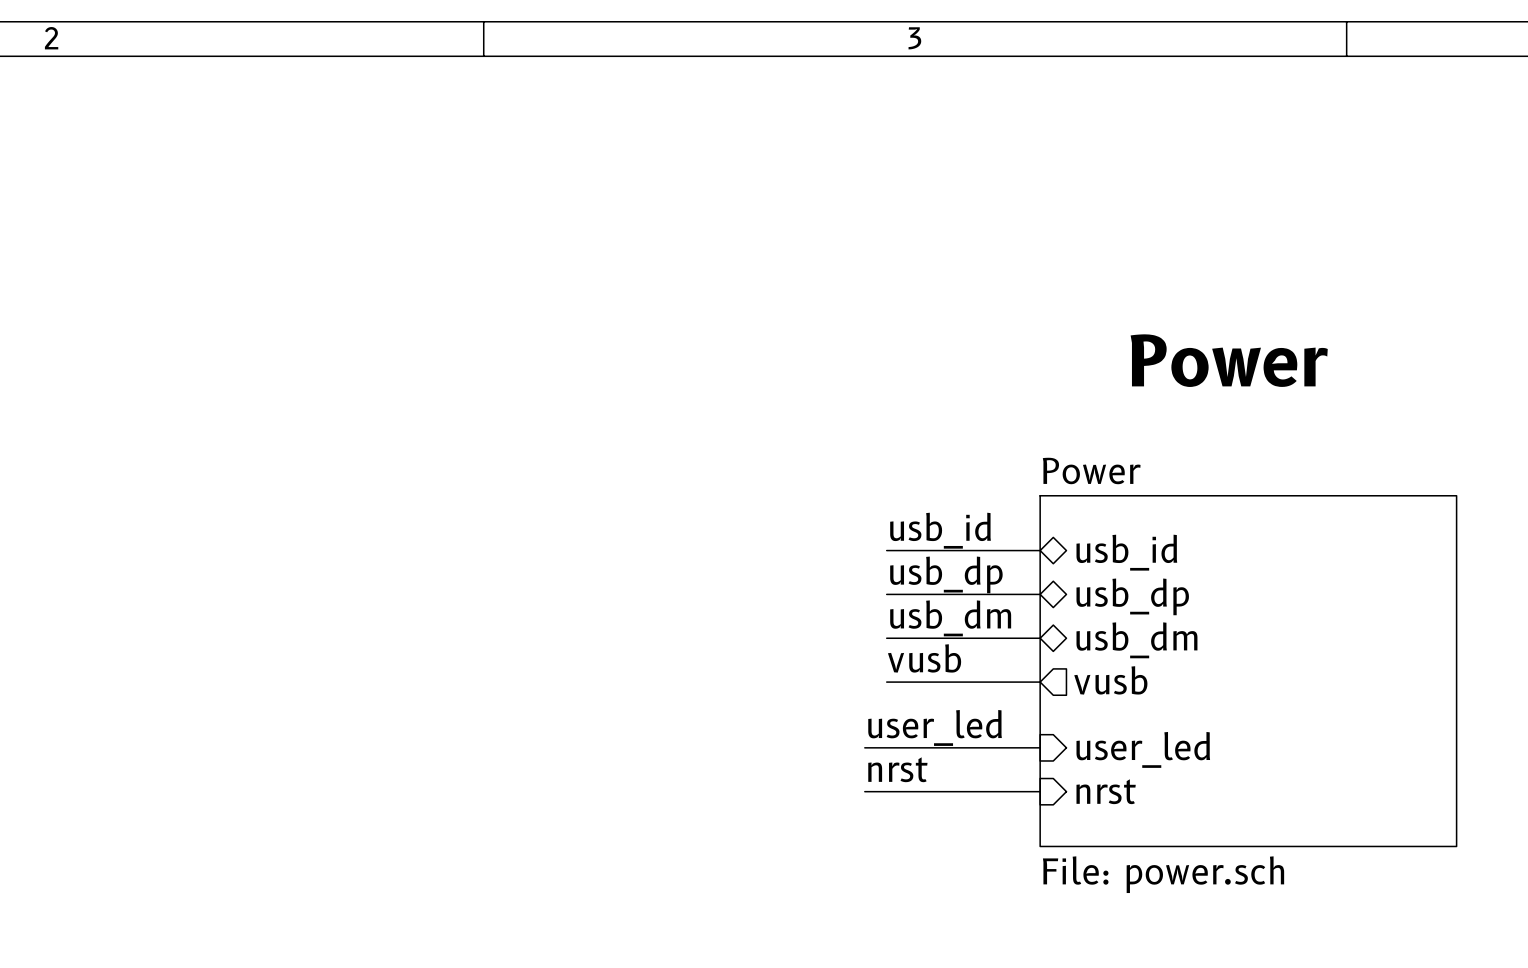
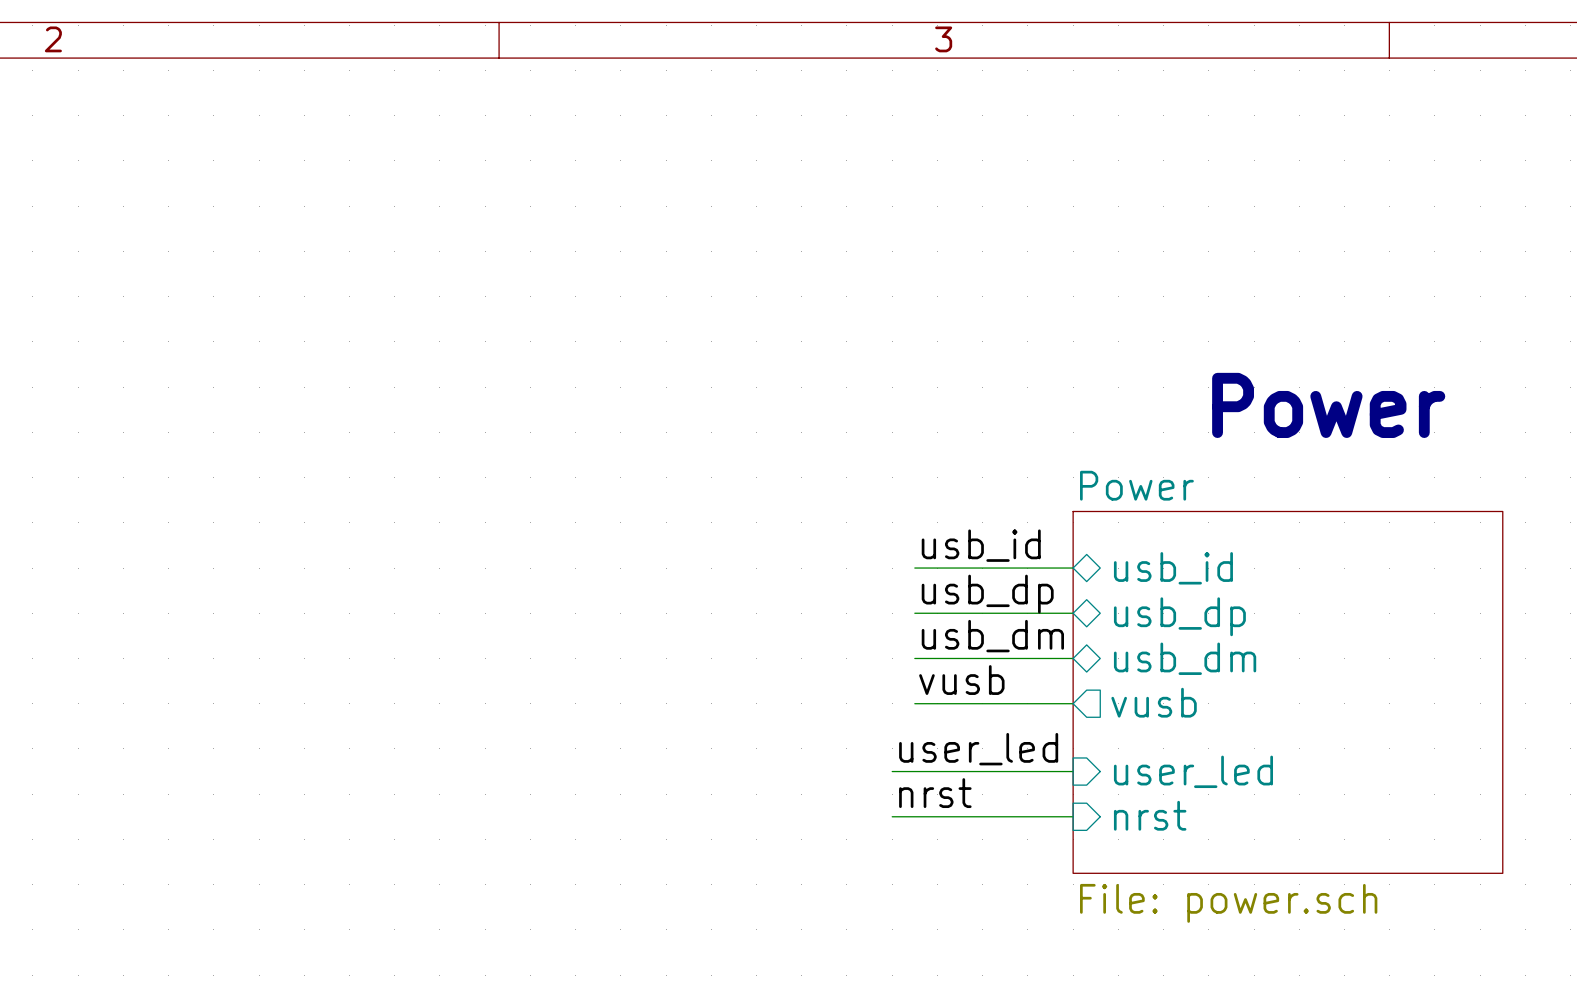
text position: Power (1229, 360) -> Power (1328, 405)

